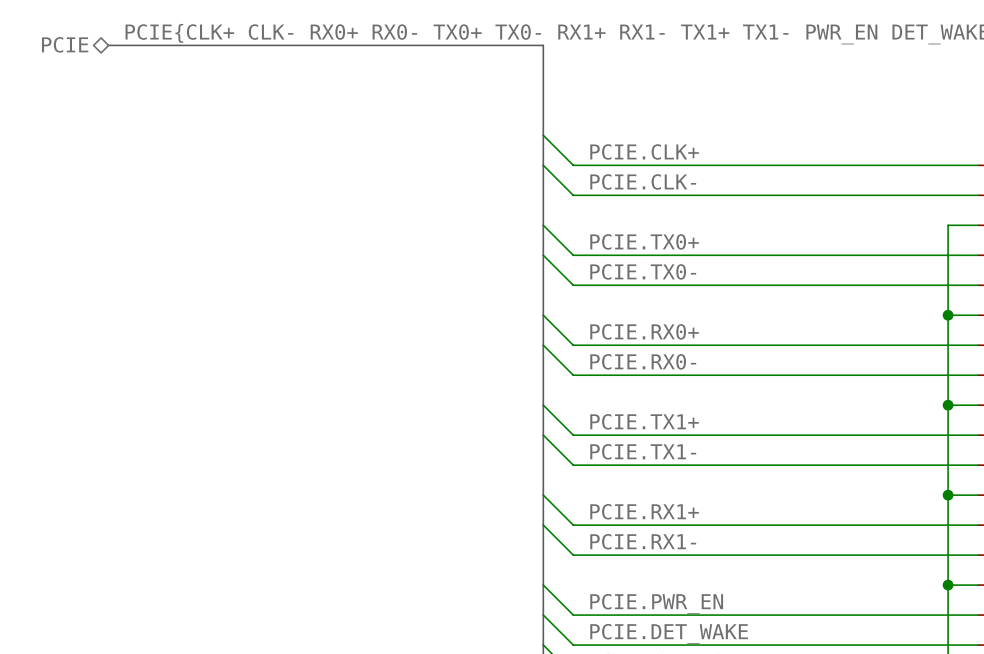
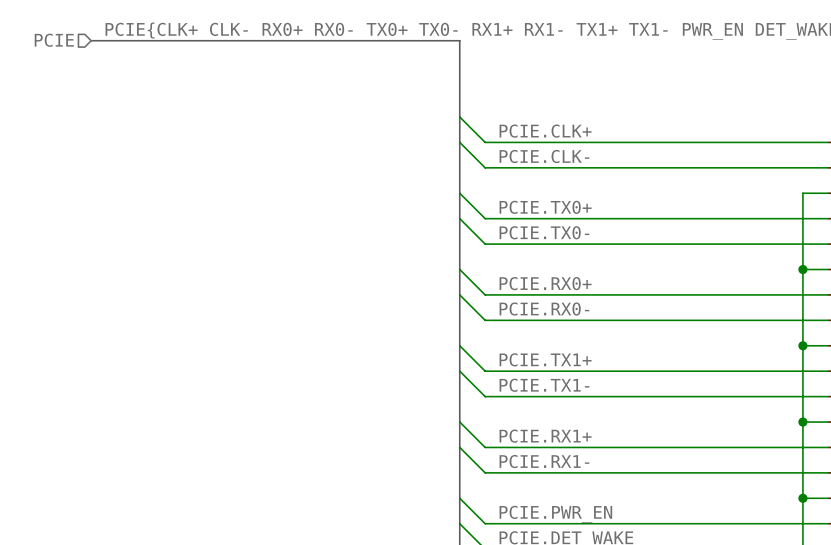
hierarchical label shape: bidirectional (65, 44) -> input (54, 40)

